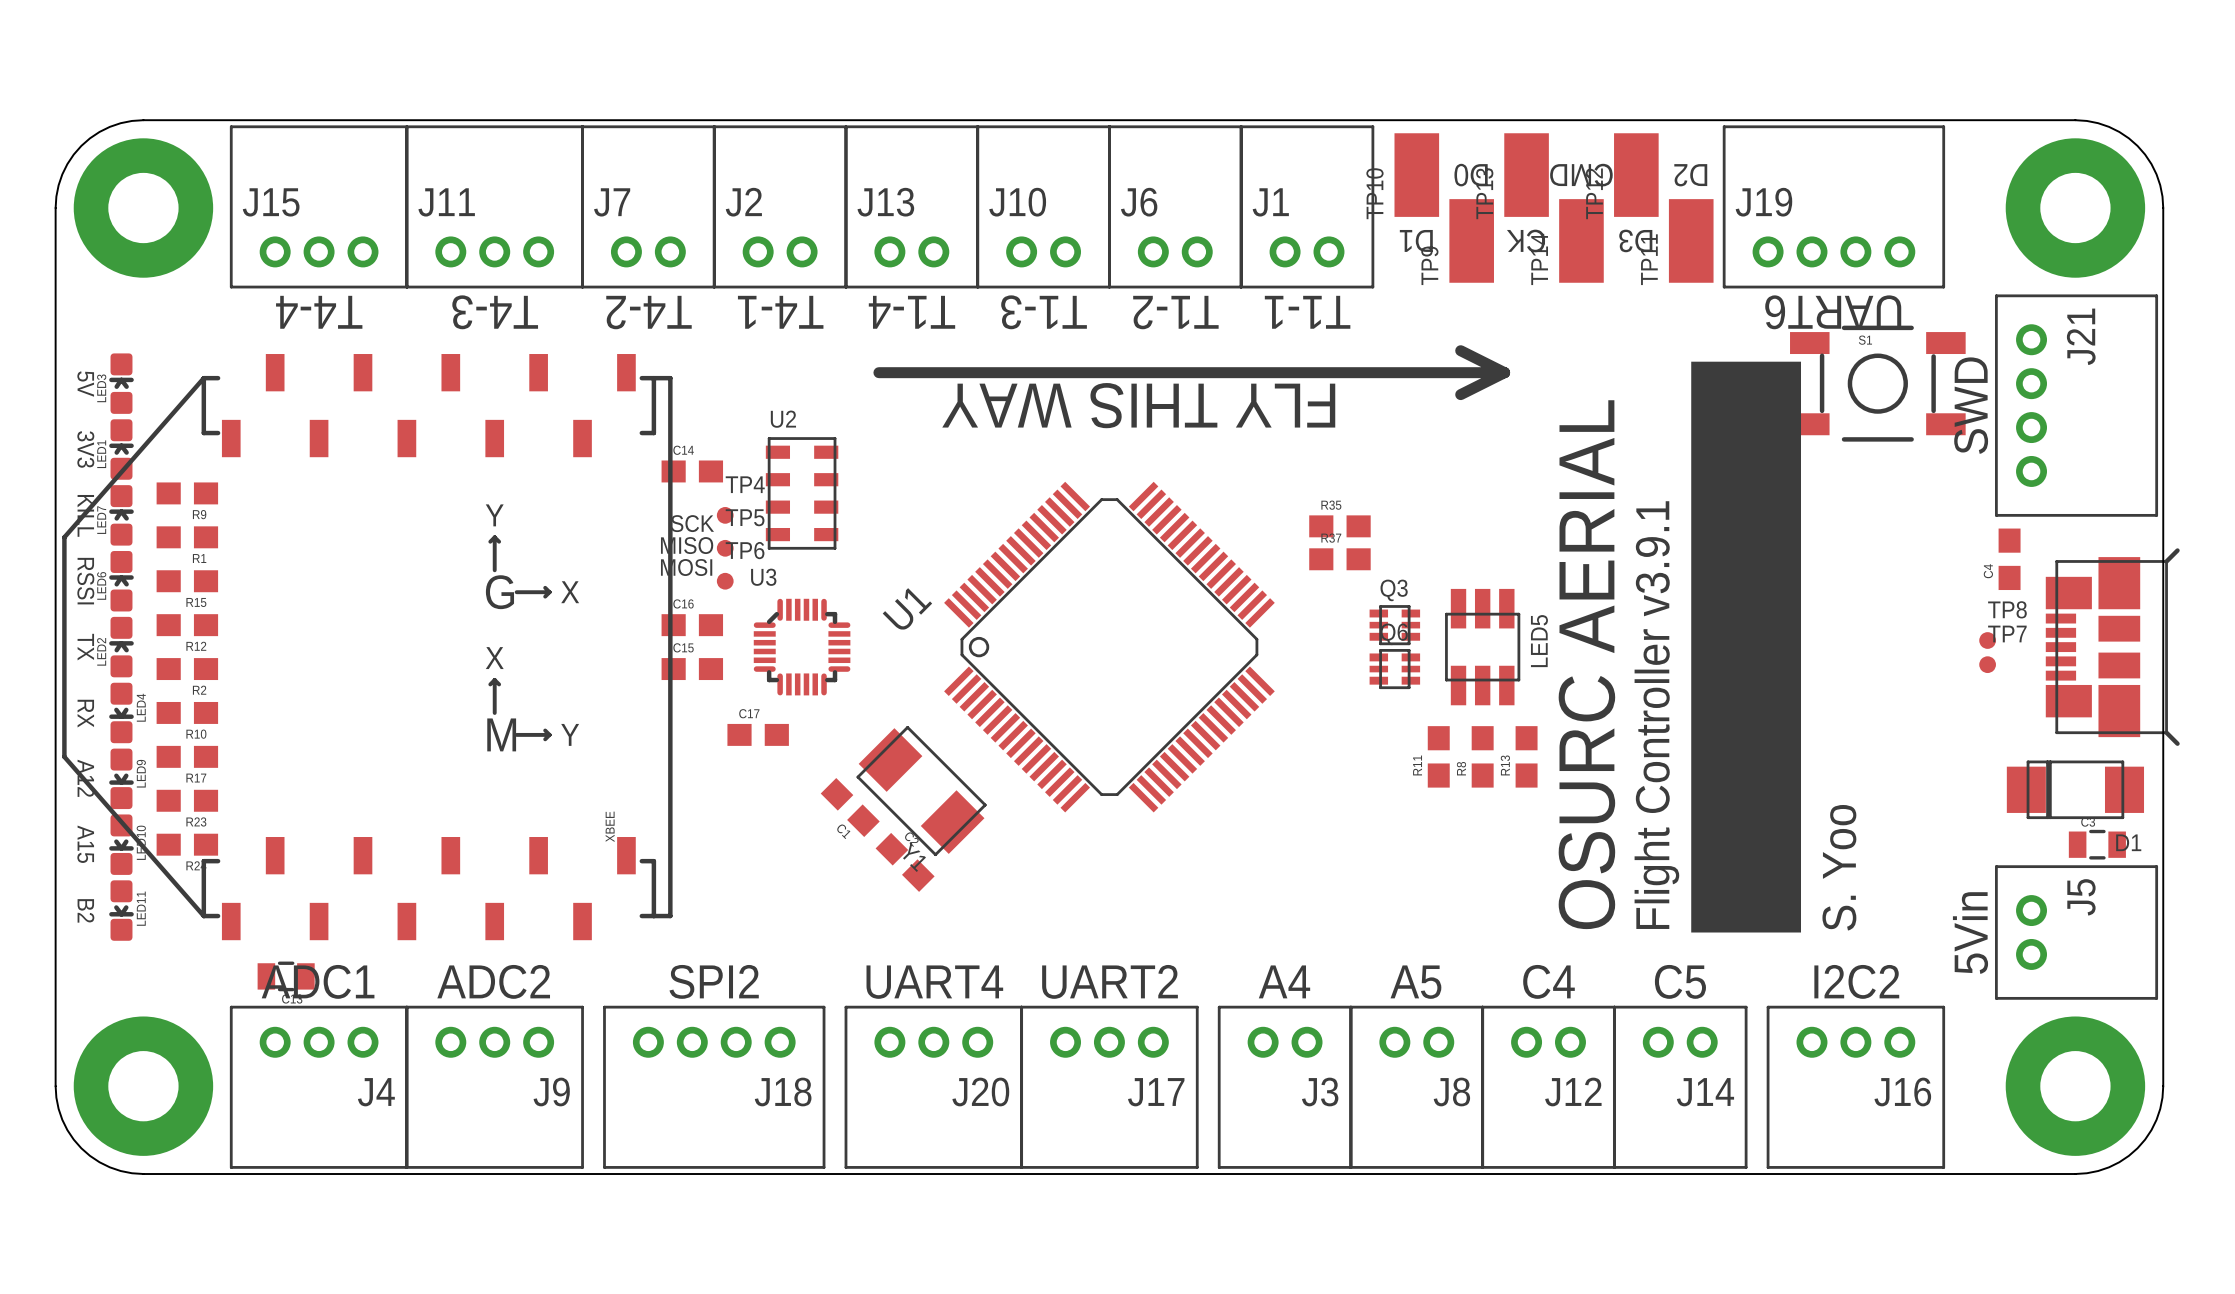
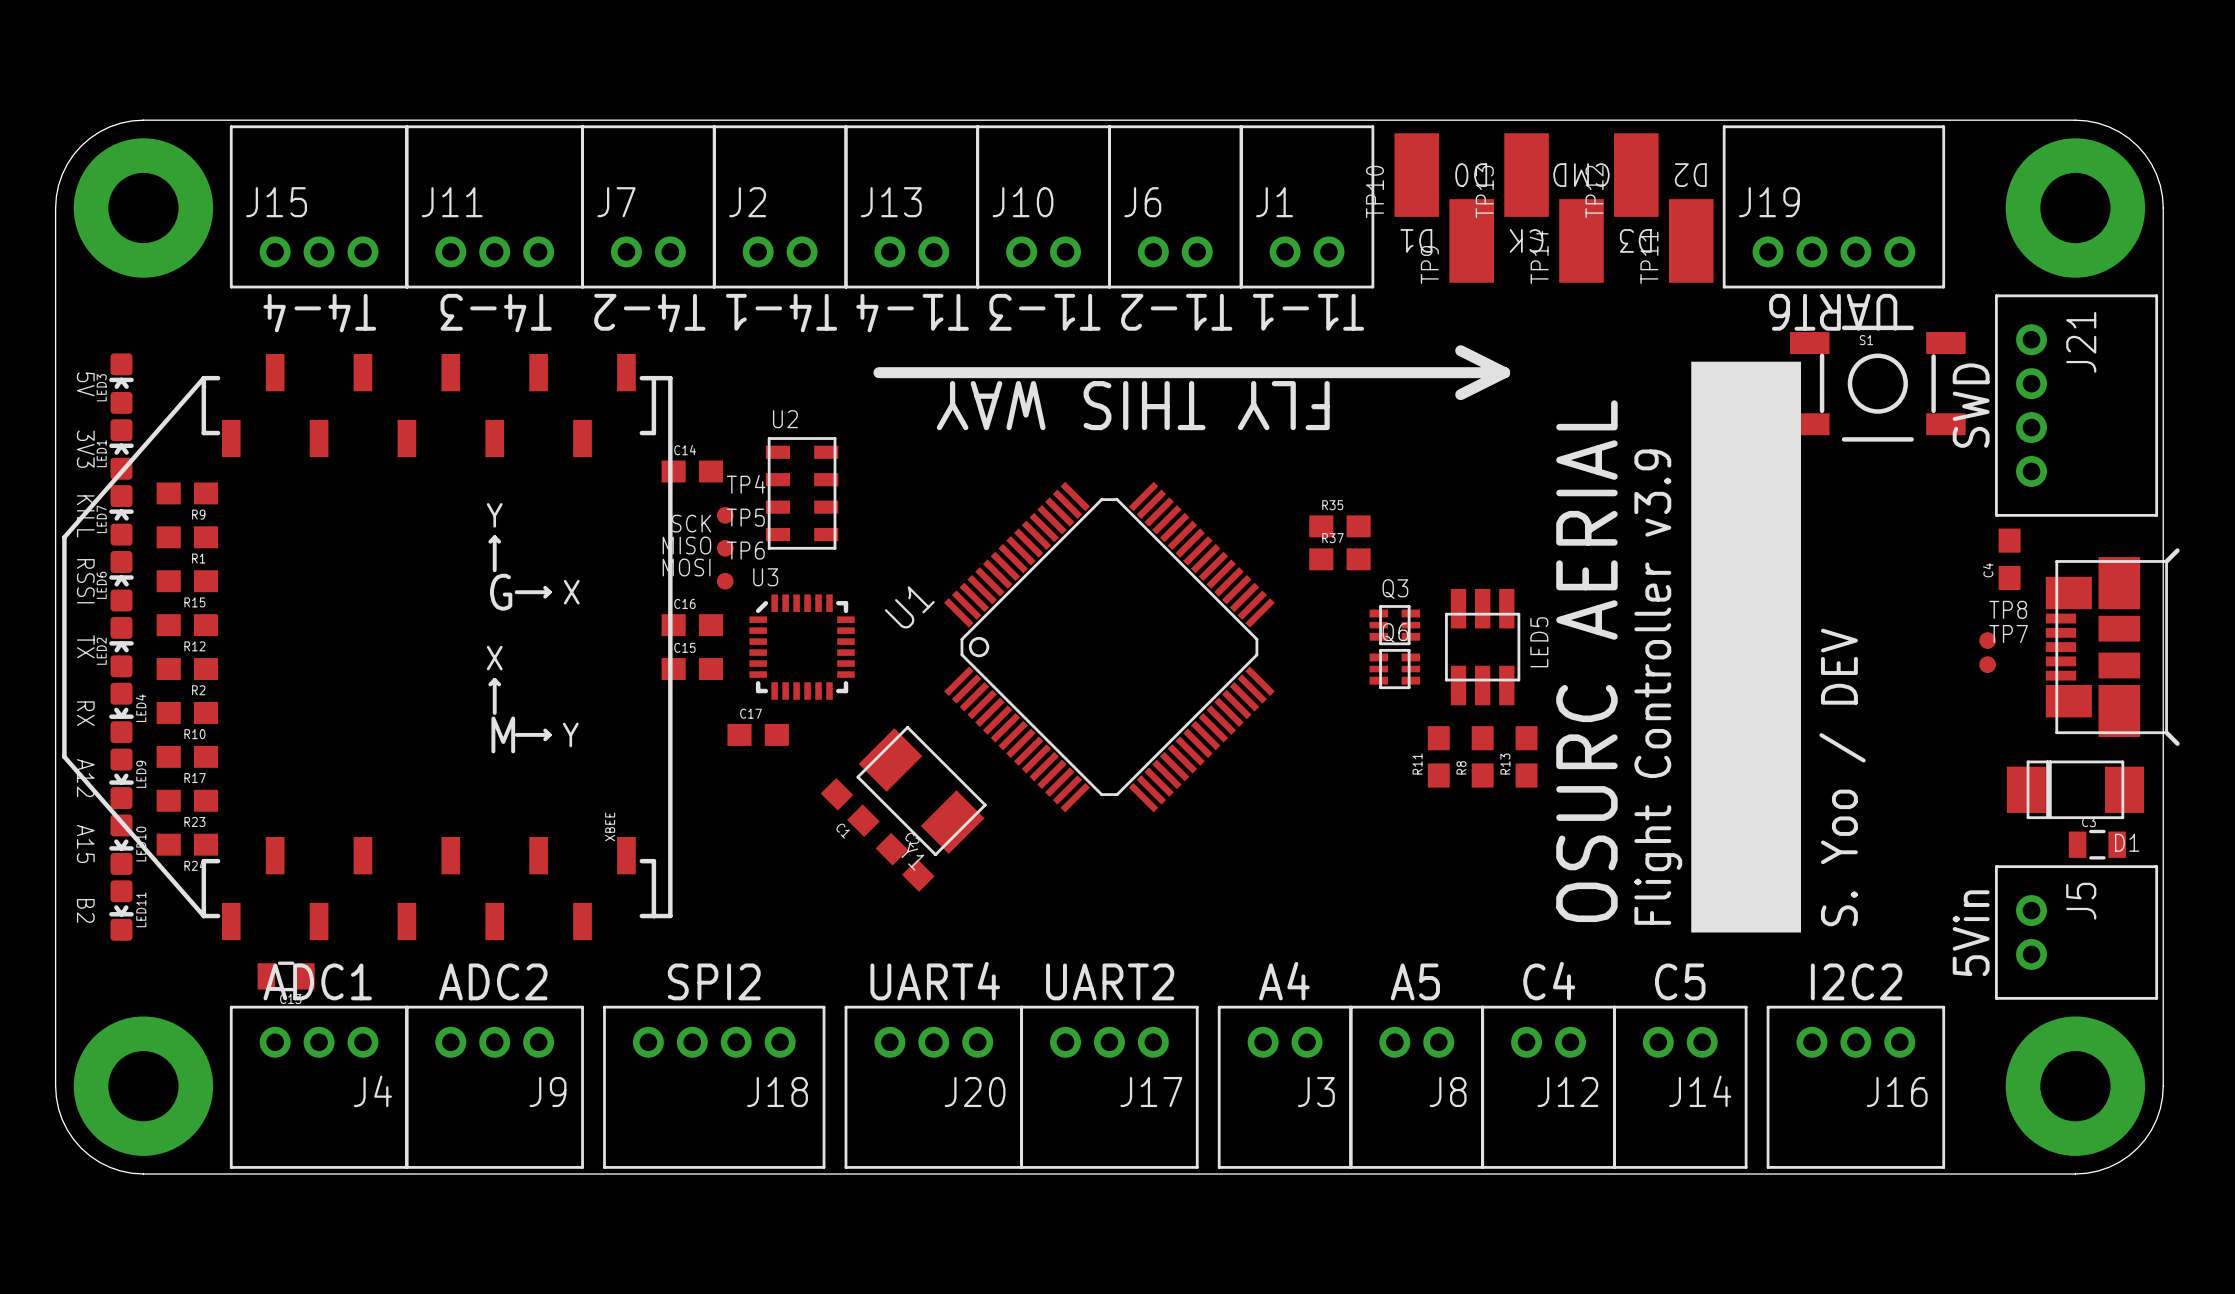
U3 footprint: [753, 598, 851, 696] -> [749, 594, 855, 700]
text: Flight Controller v3.9.1 (1656, 715) -> Flight Controller v3.9 (1658, 687)
text: S. Yoo (1839, 867) -> S. Yoo / DEV (1842, 777)

